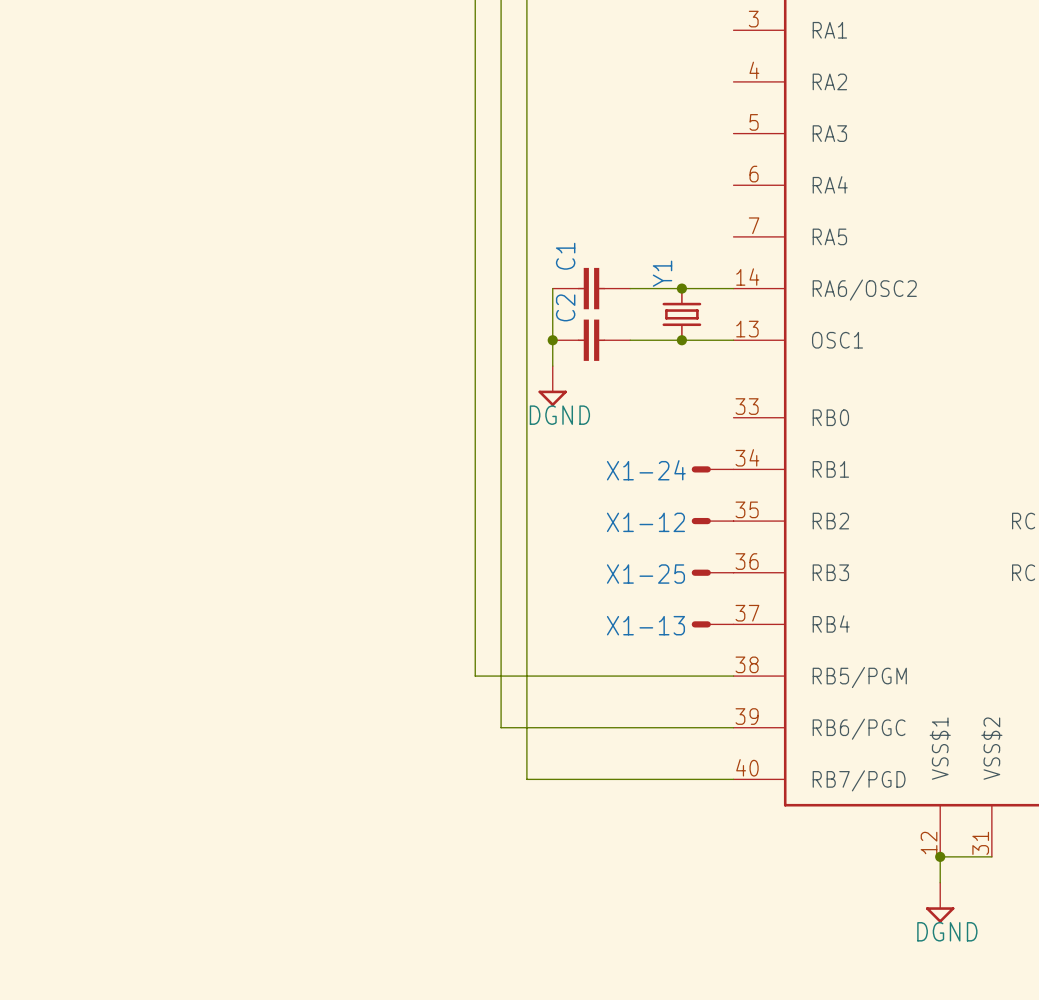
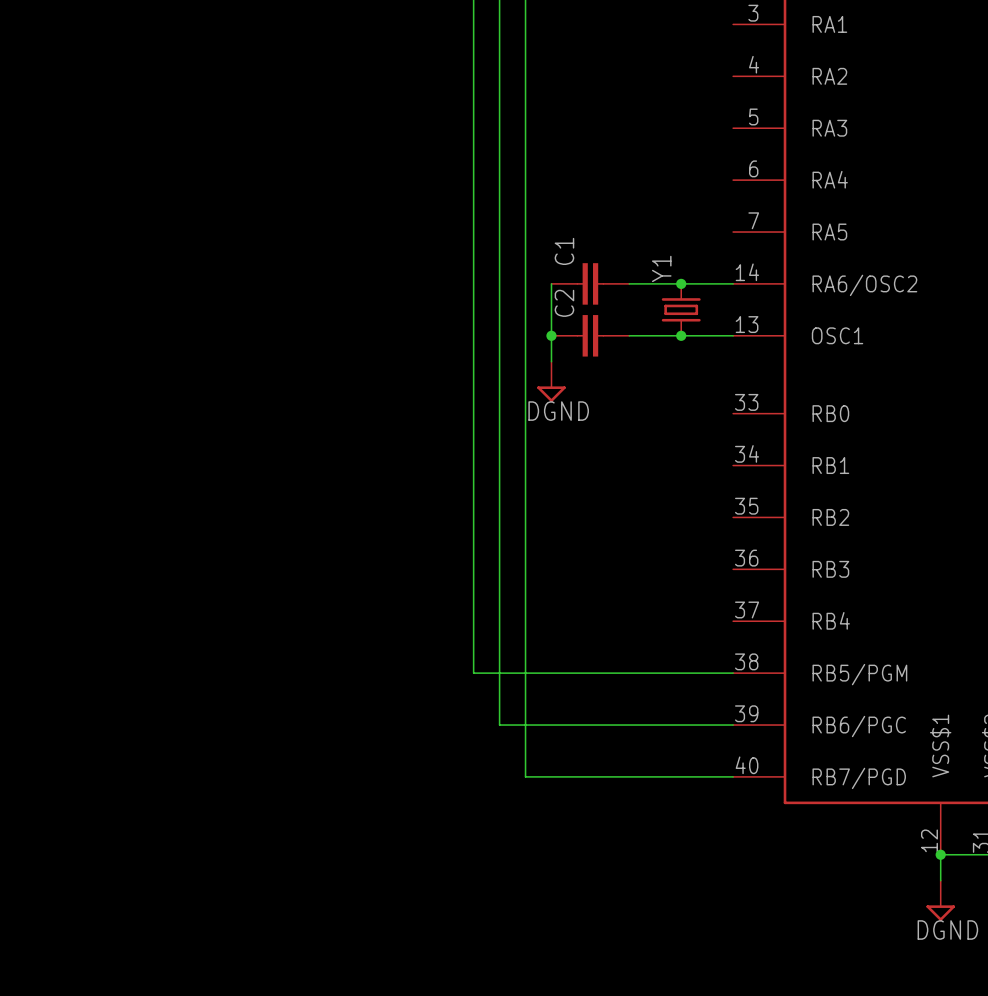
X1-24: (712, 469) -> none
X1-12: (712, 521) -> none
X1-25: (712, 572) -> none
X1-13: (712, 624) -> none

